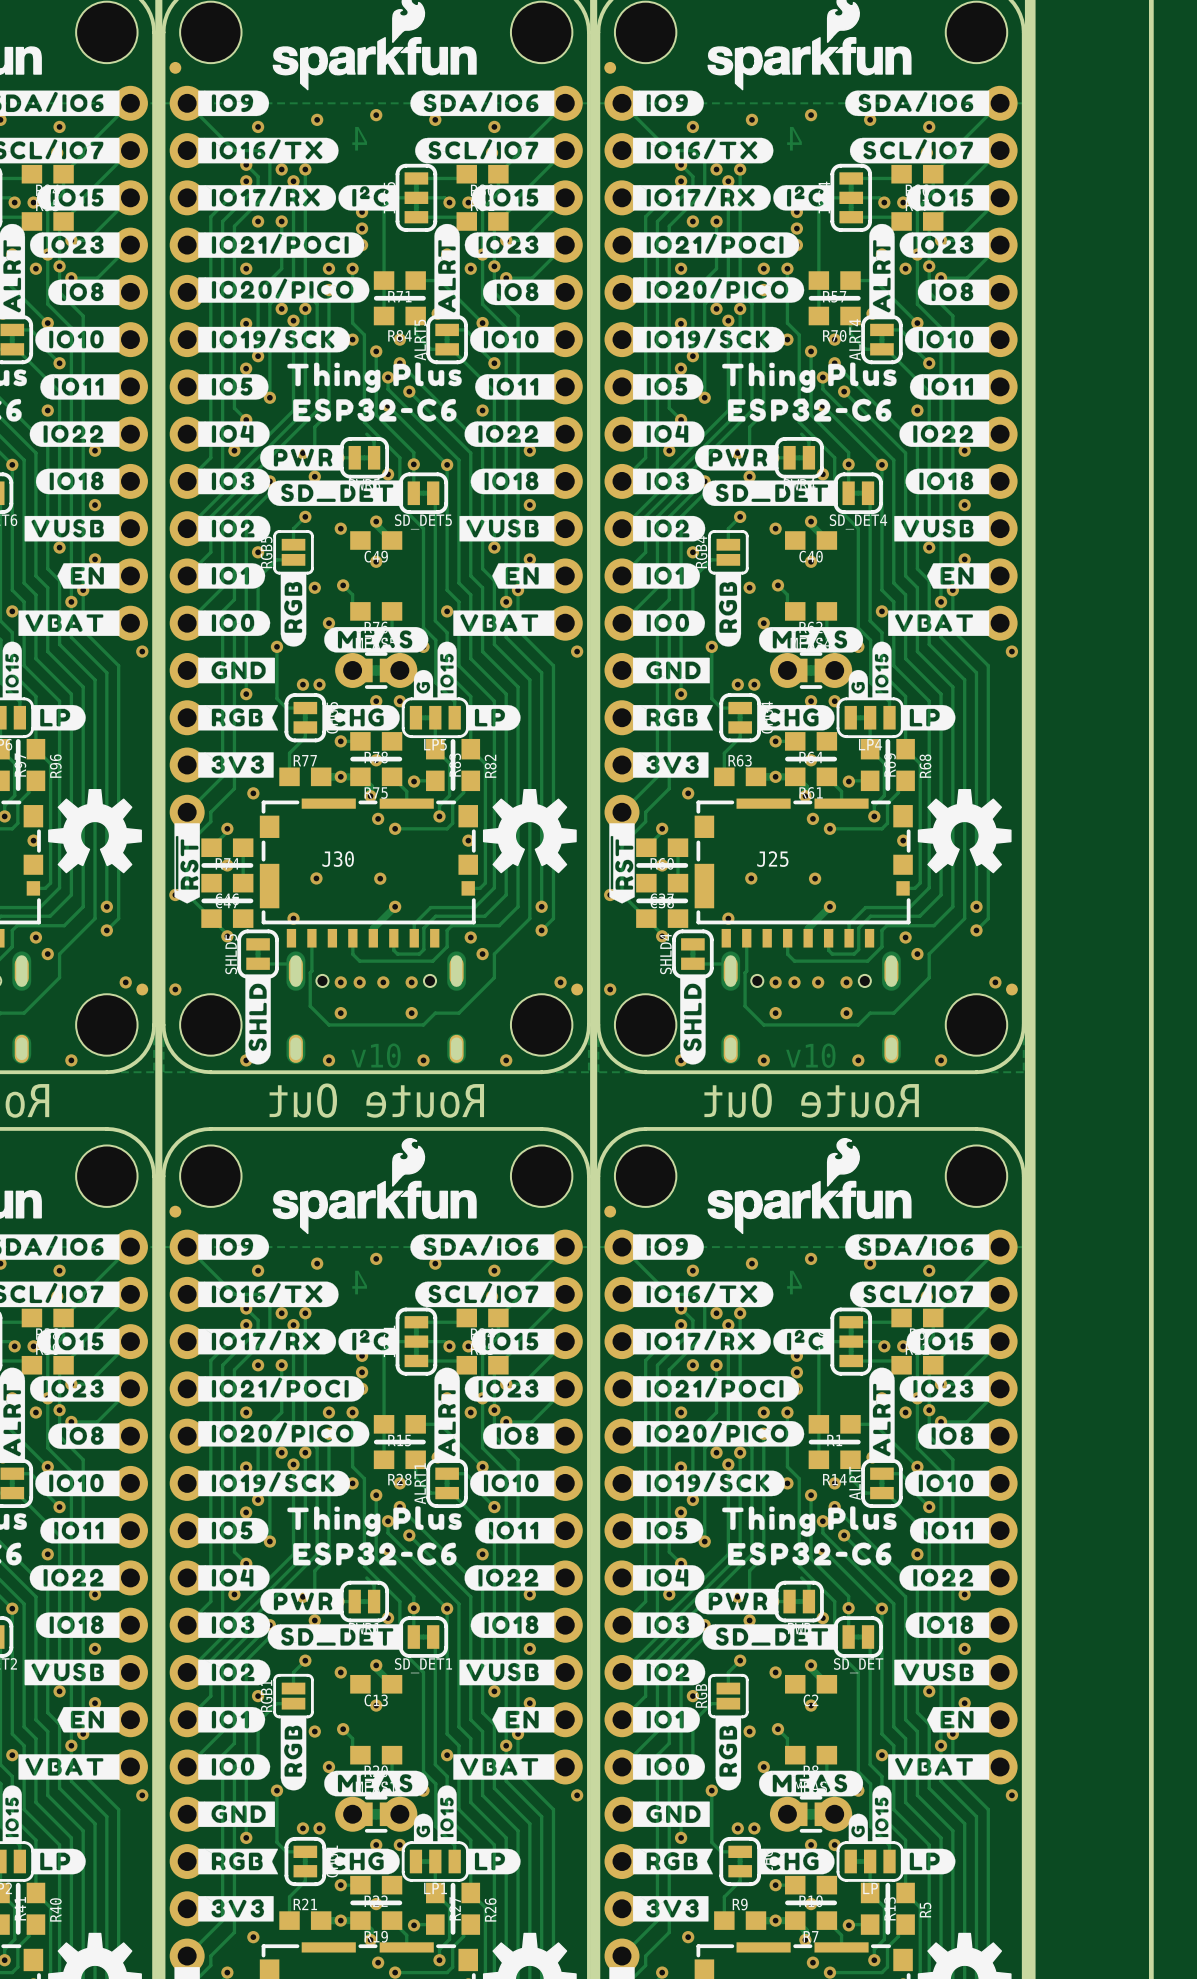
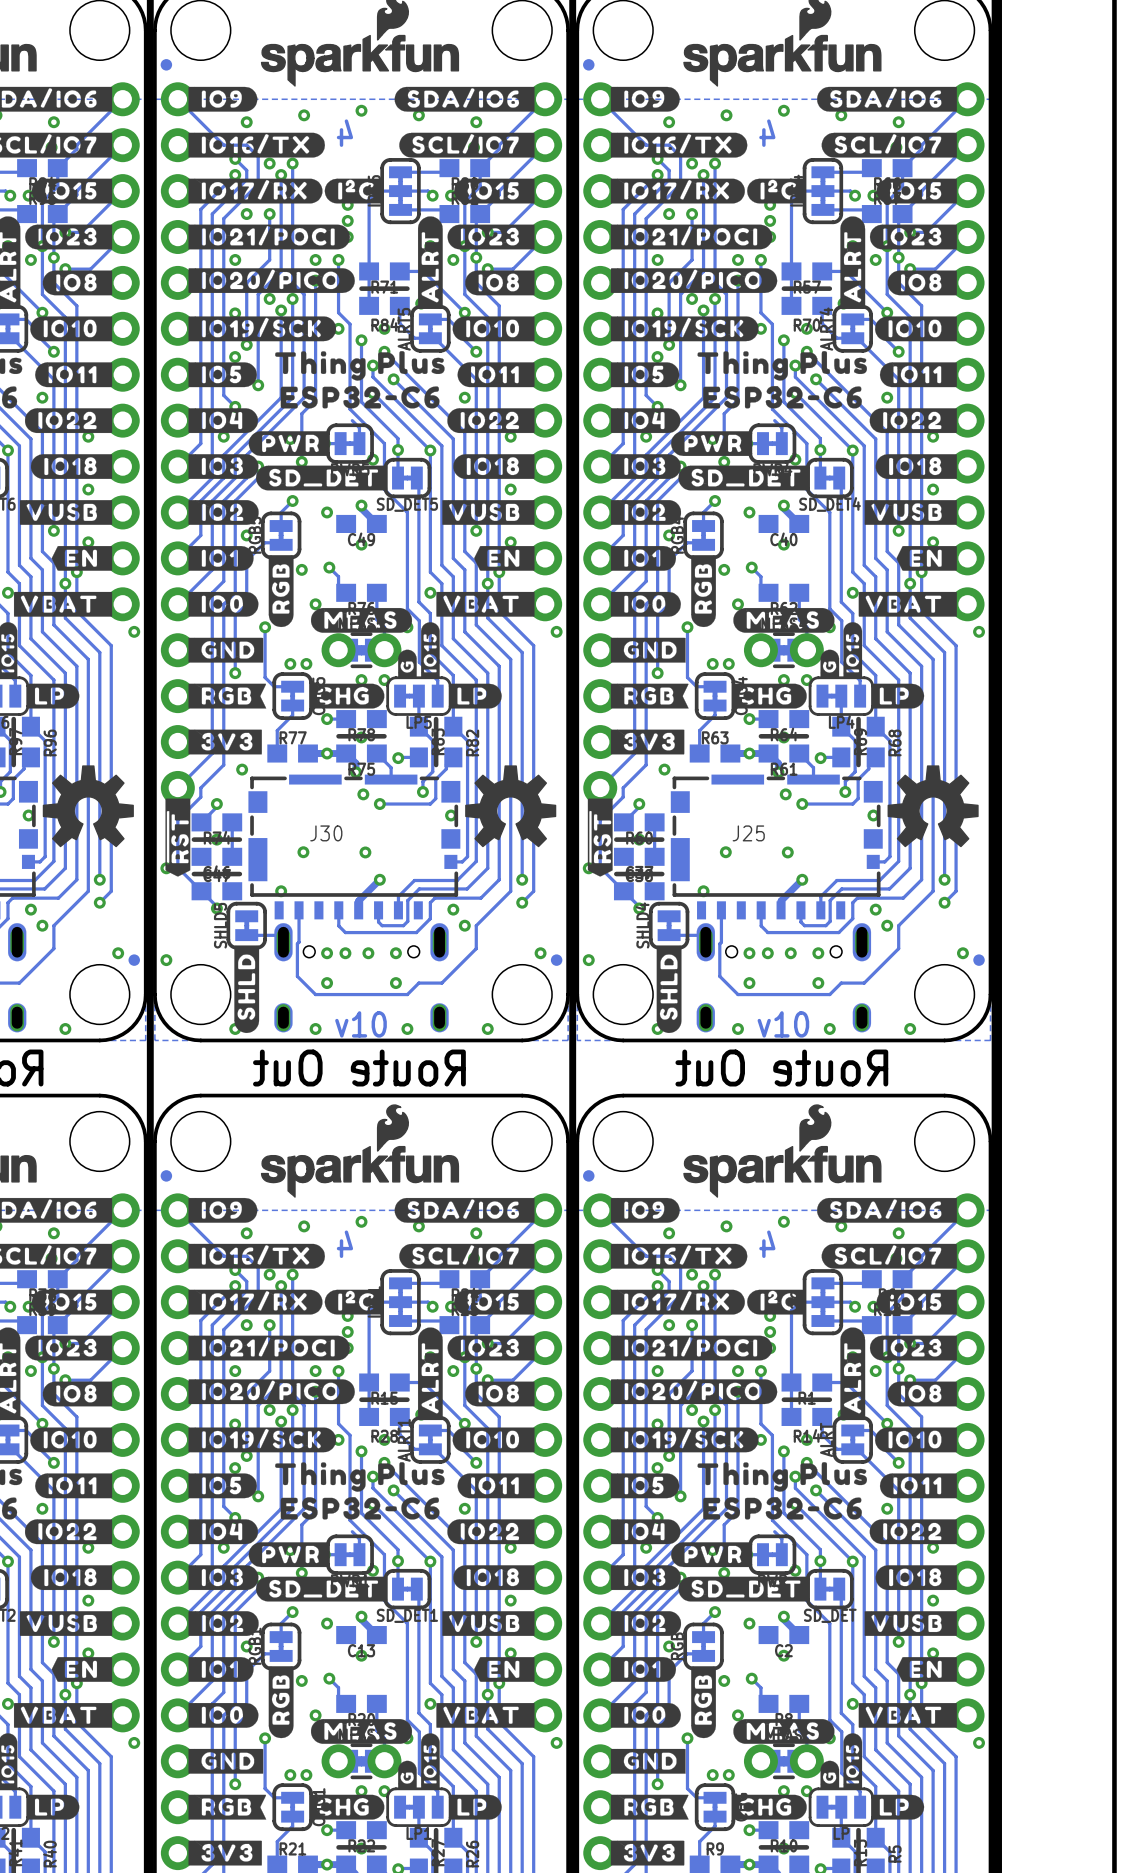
RGB5 footprint: [273, 530, 314, 575] -> [260, 511, 302, 560]
RGB4 footprint: [708, 530, 749, 575] -> [683, 511, 724, 560]
RGB1 footprint: [273, 1673, 314, 1719] -> [260, 1622, 302, 1671]
RGB footprint: [708, 1673, 749, 1719] -> [683, 1622, 724, 1671]

